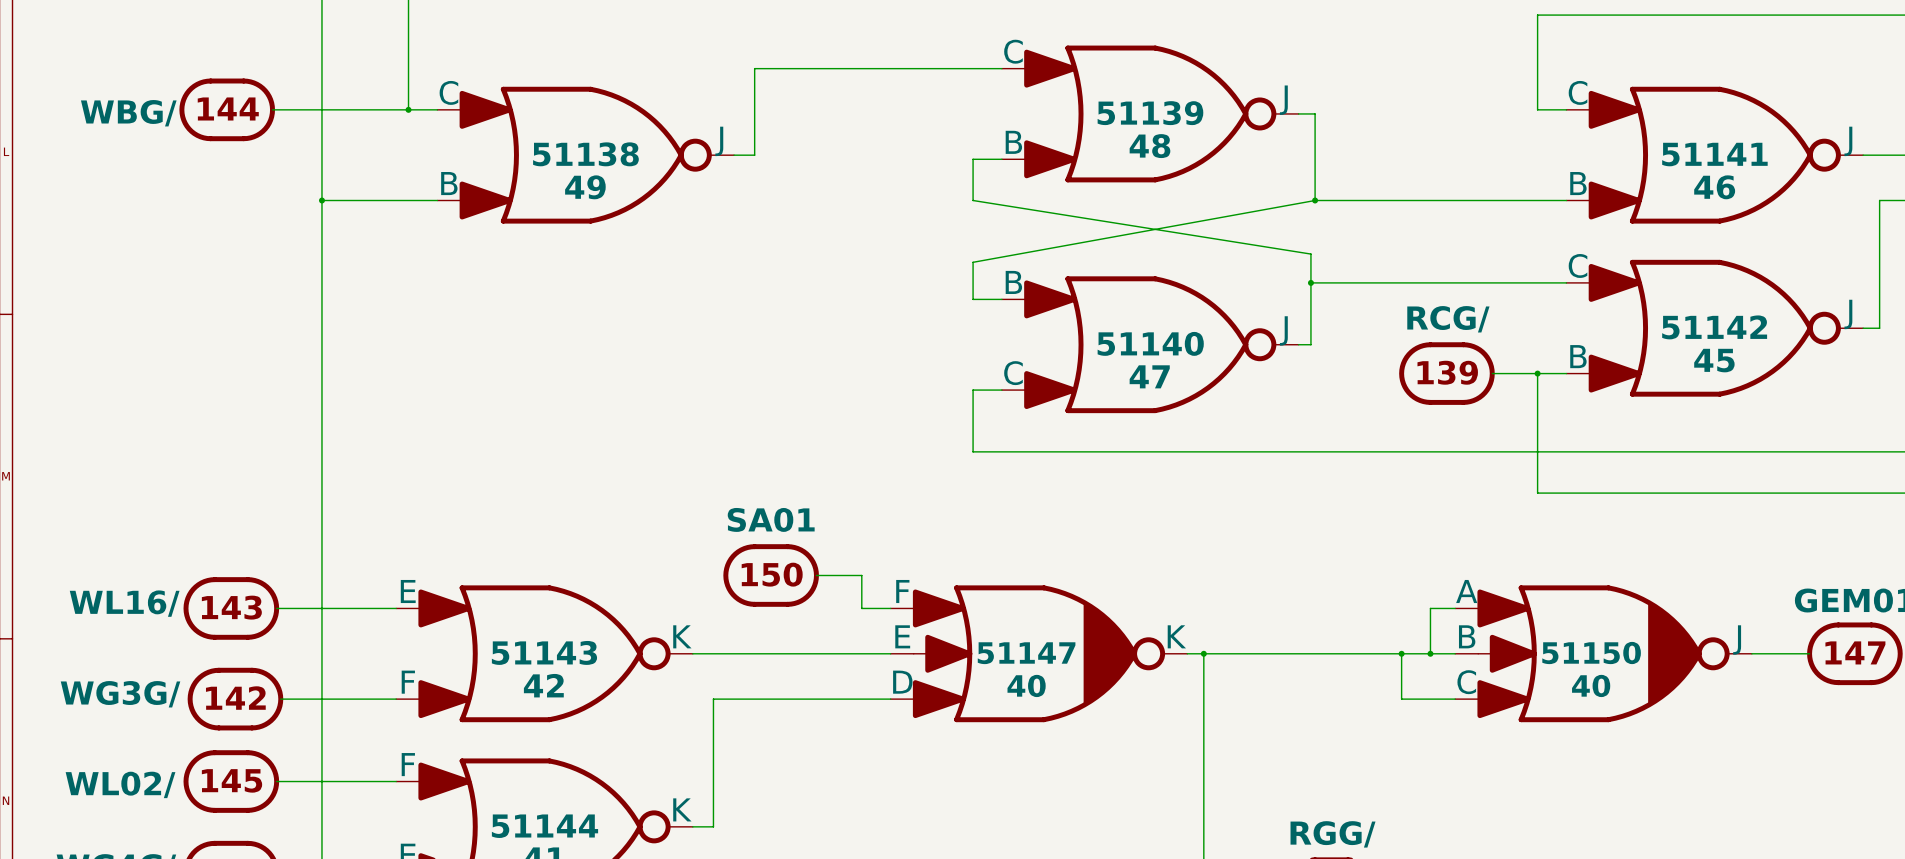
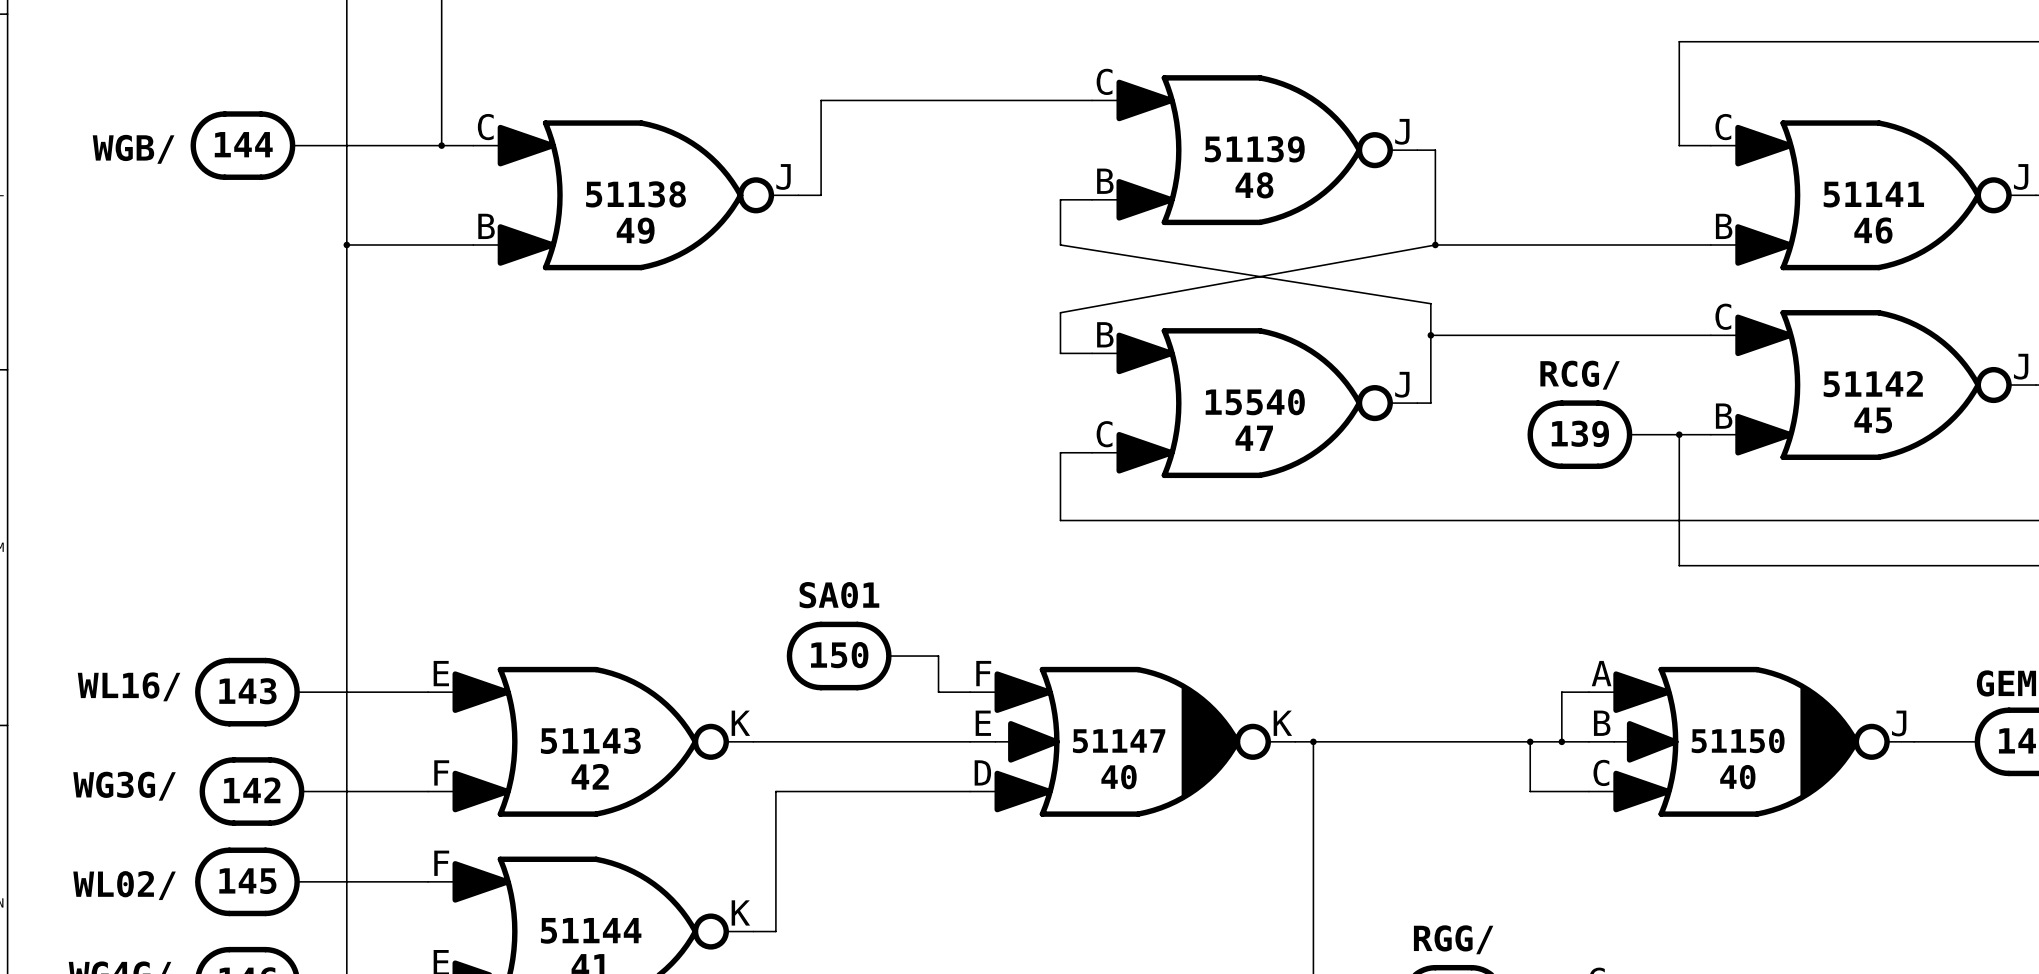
part text: WBG/ (128, 113) -> WGB/ (133, 149)
part text: 51140 (1150, 343) -> 15540 (1255, 402)

